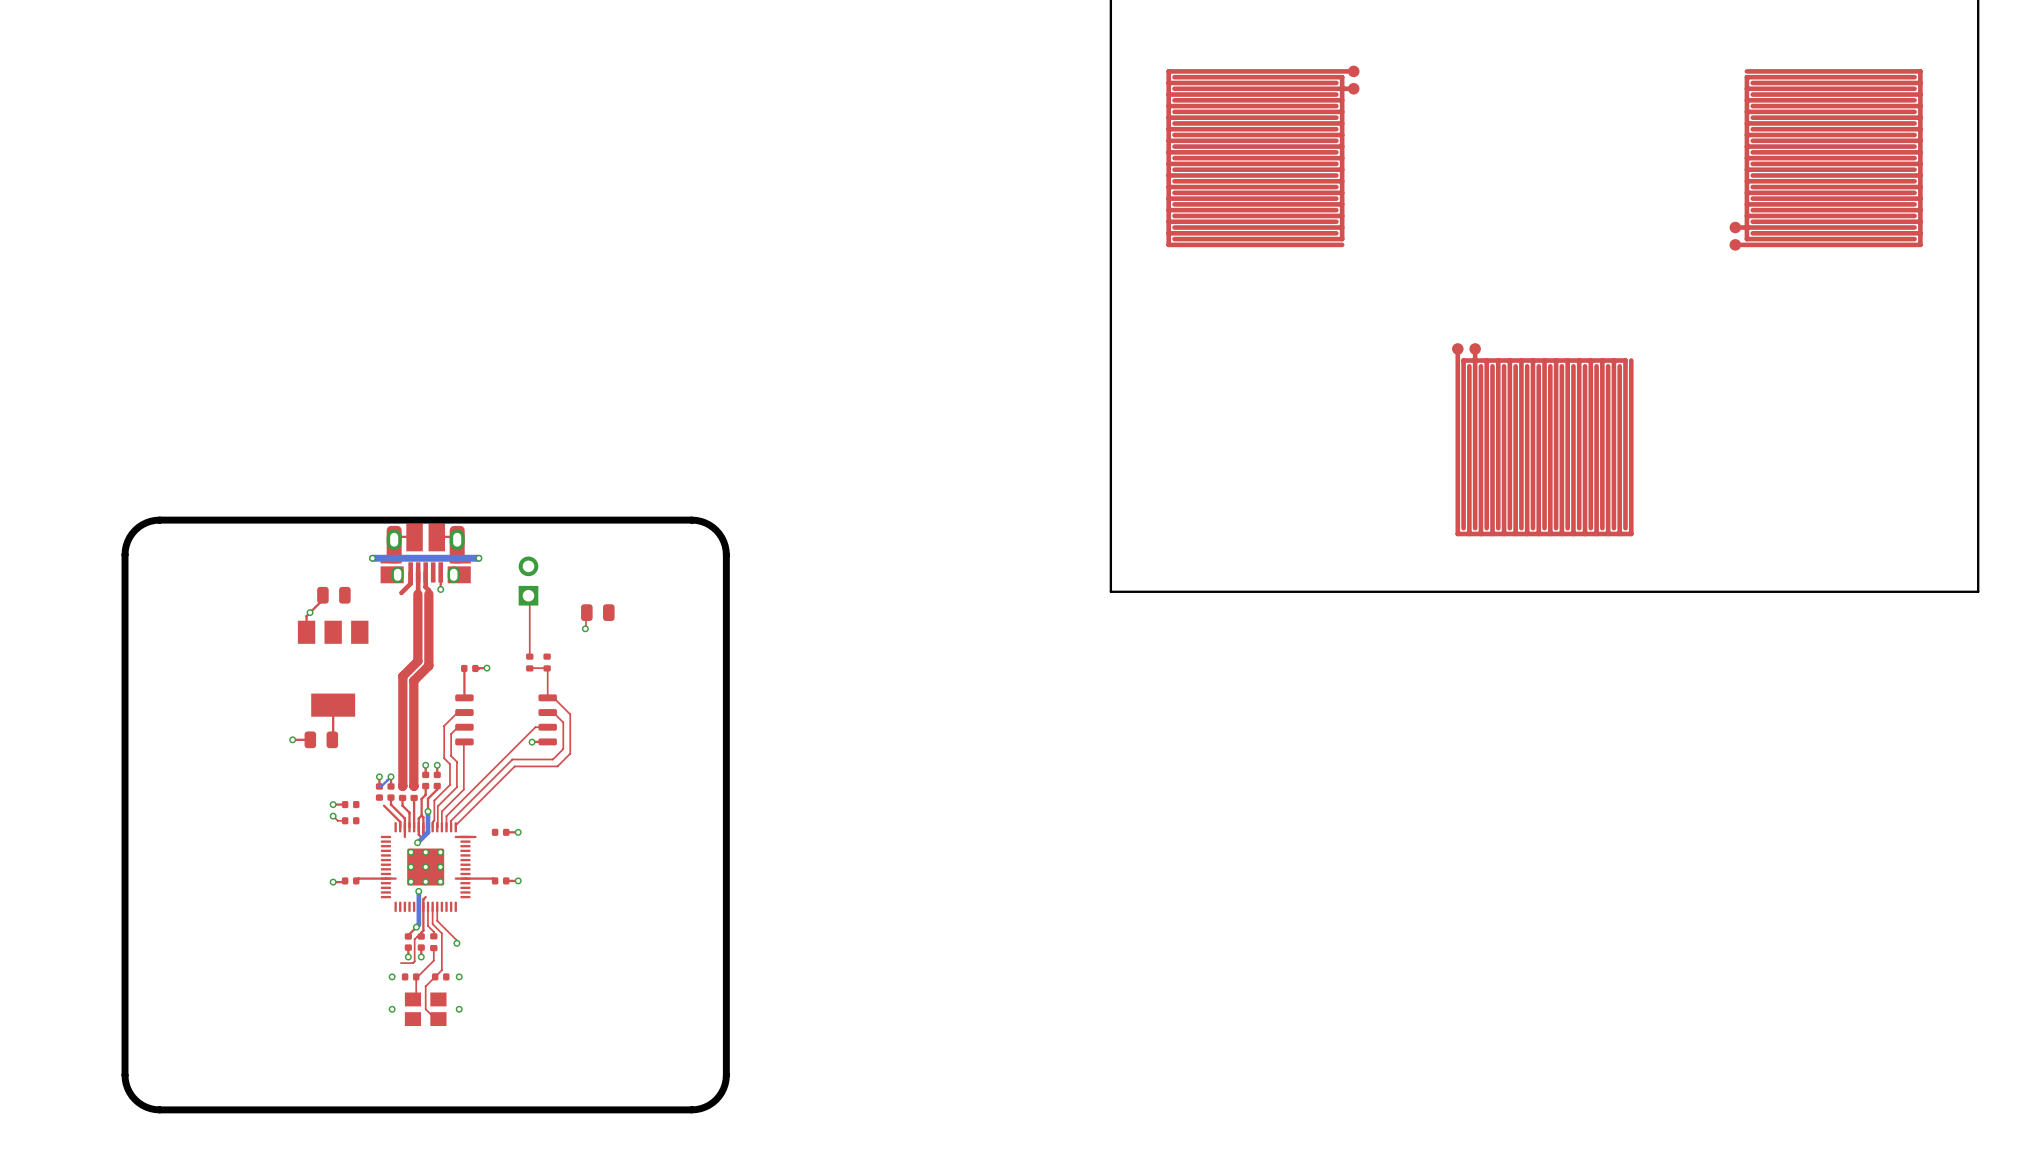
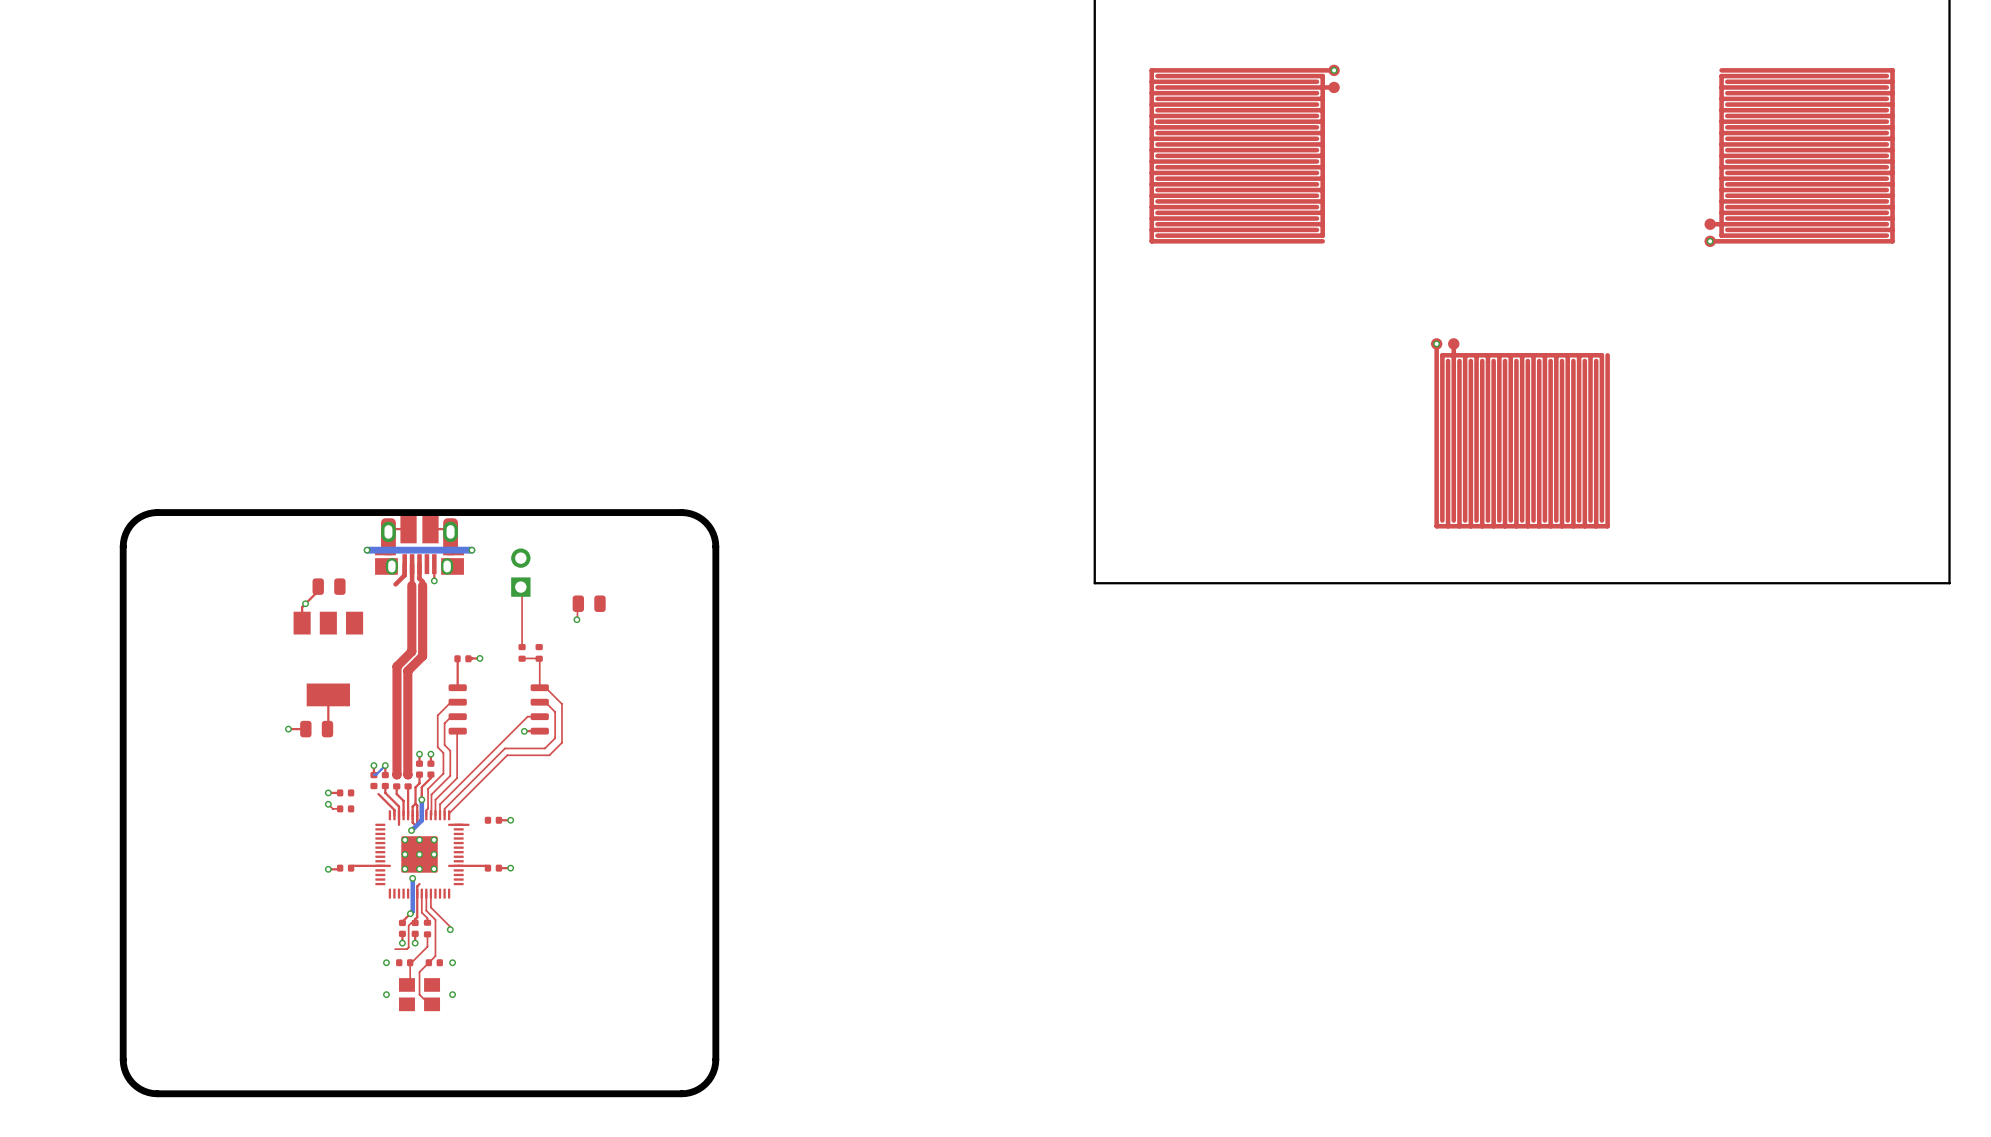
via: none -> (1334, 70)
via: none -> (1710, 241)
via: none -> (1436, 343)

